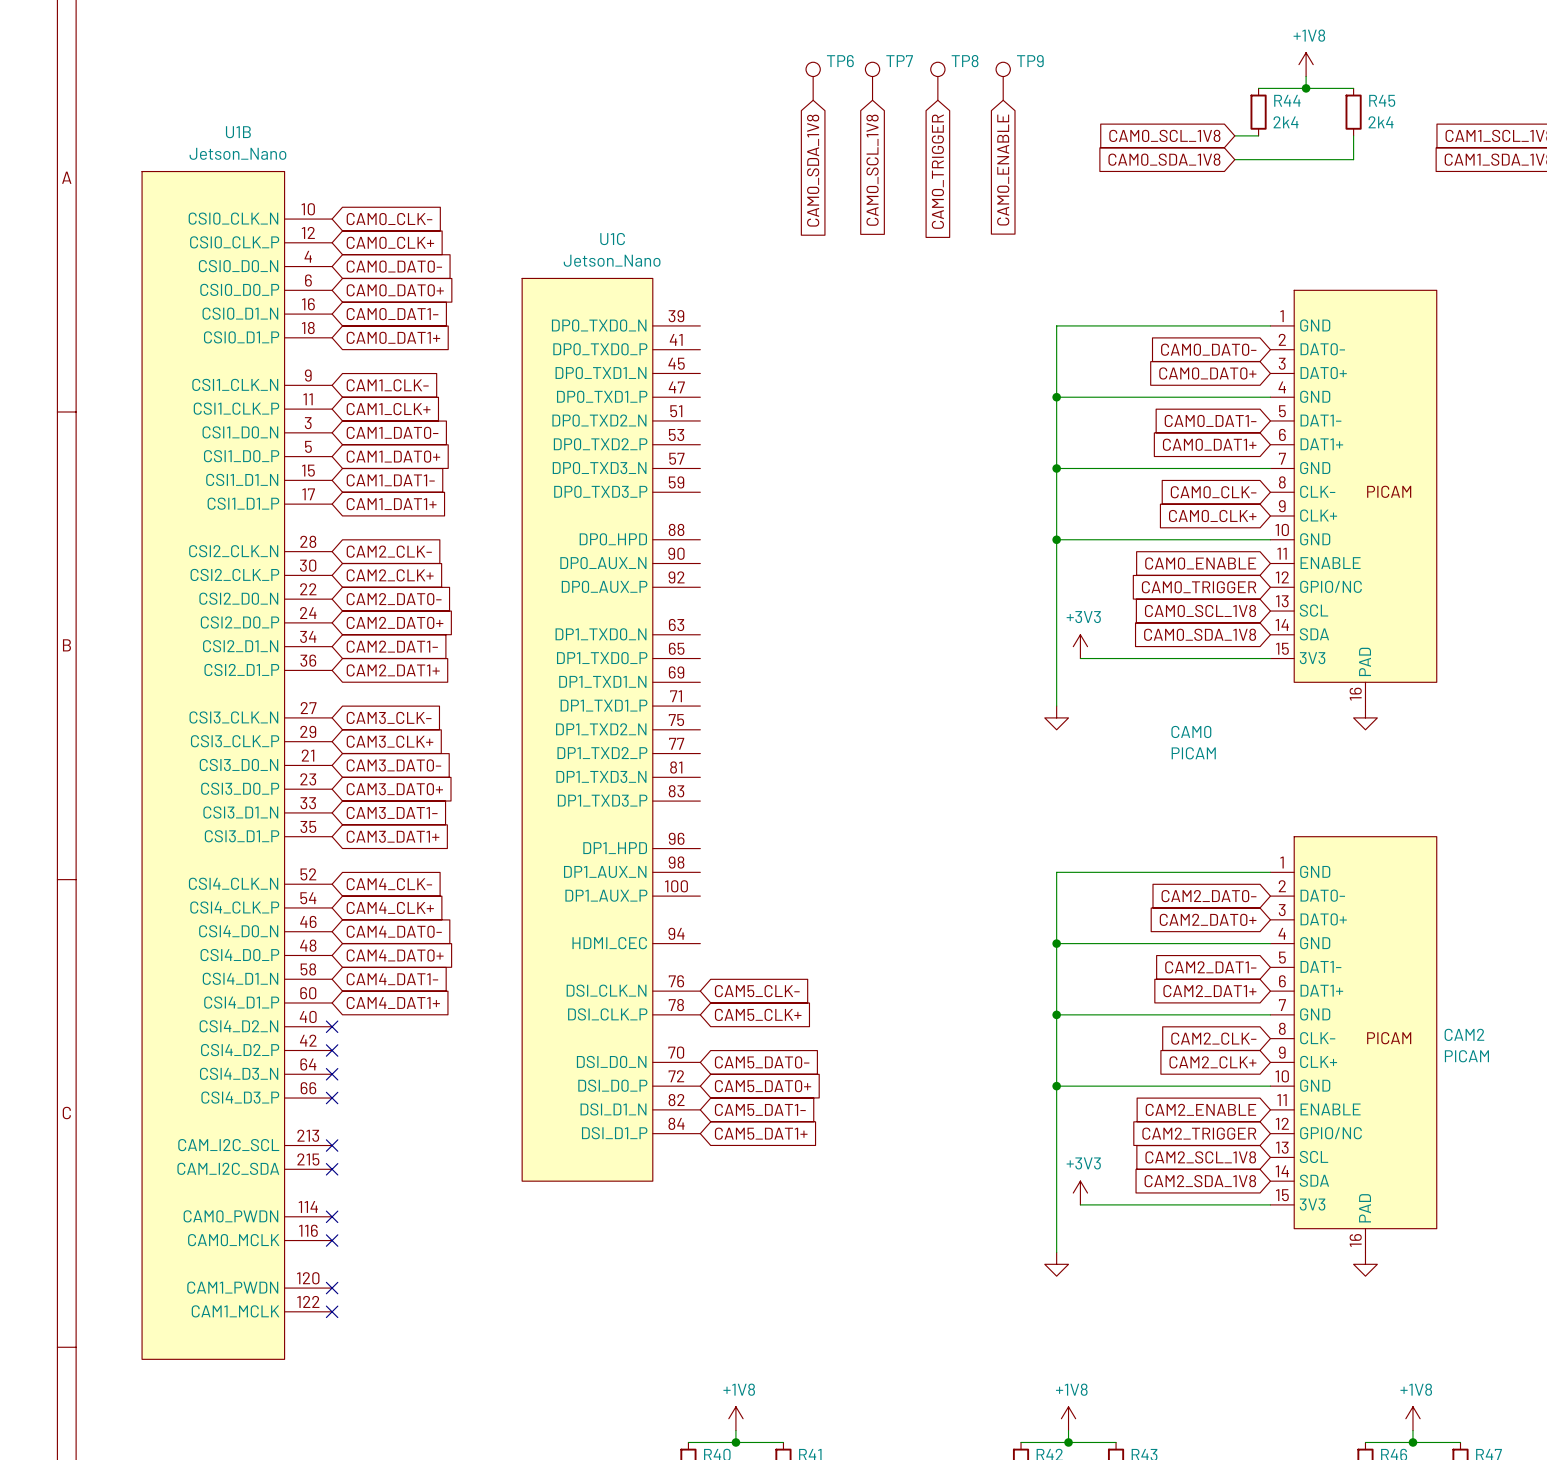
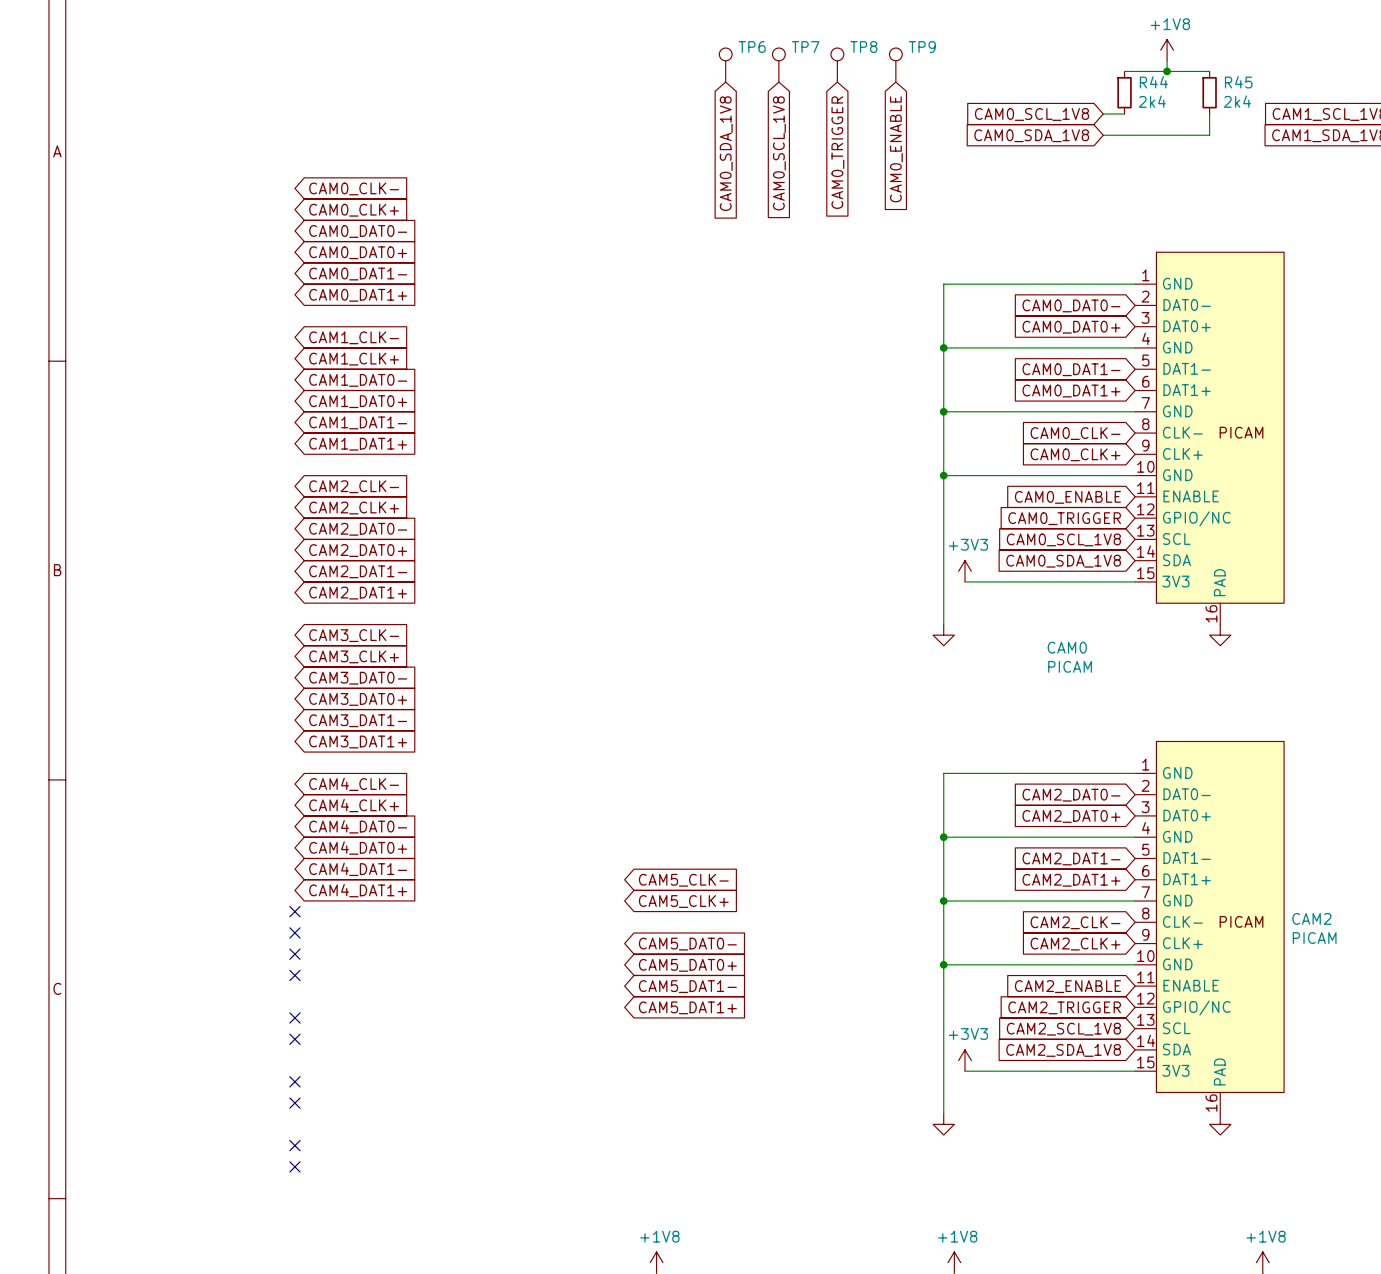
U1C: Jetson_Nano (611, 729) -> none
U1B: Jetson_Nano (237, 765) -> none

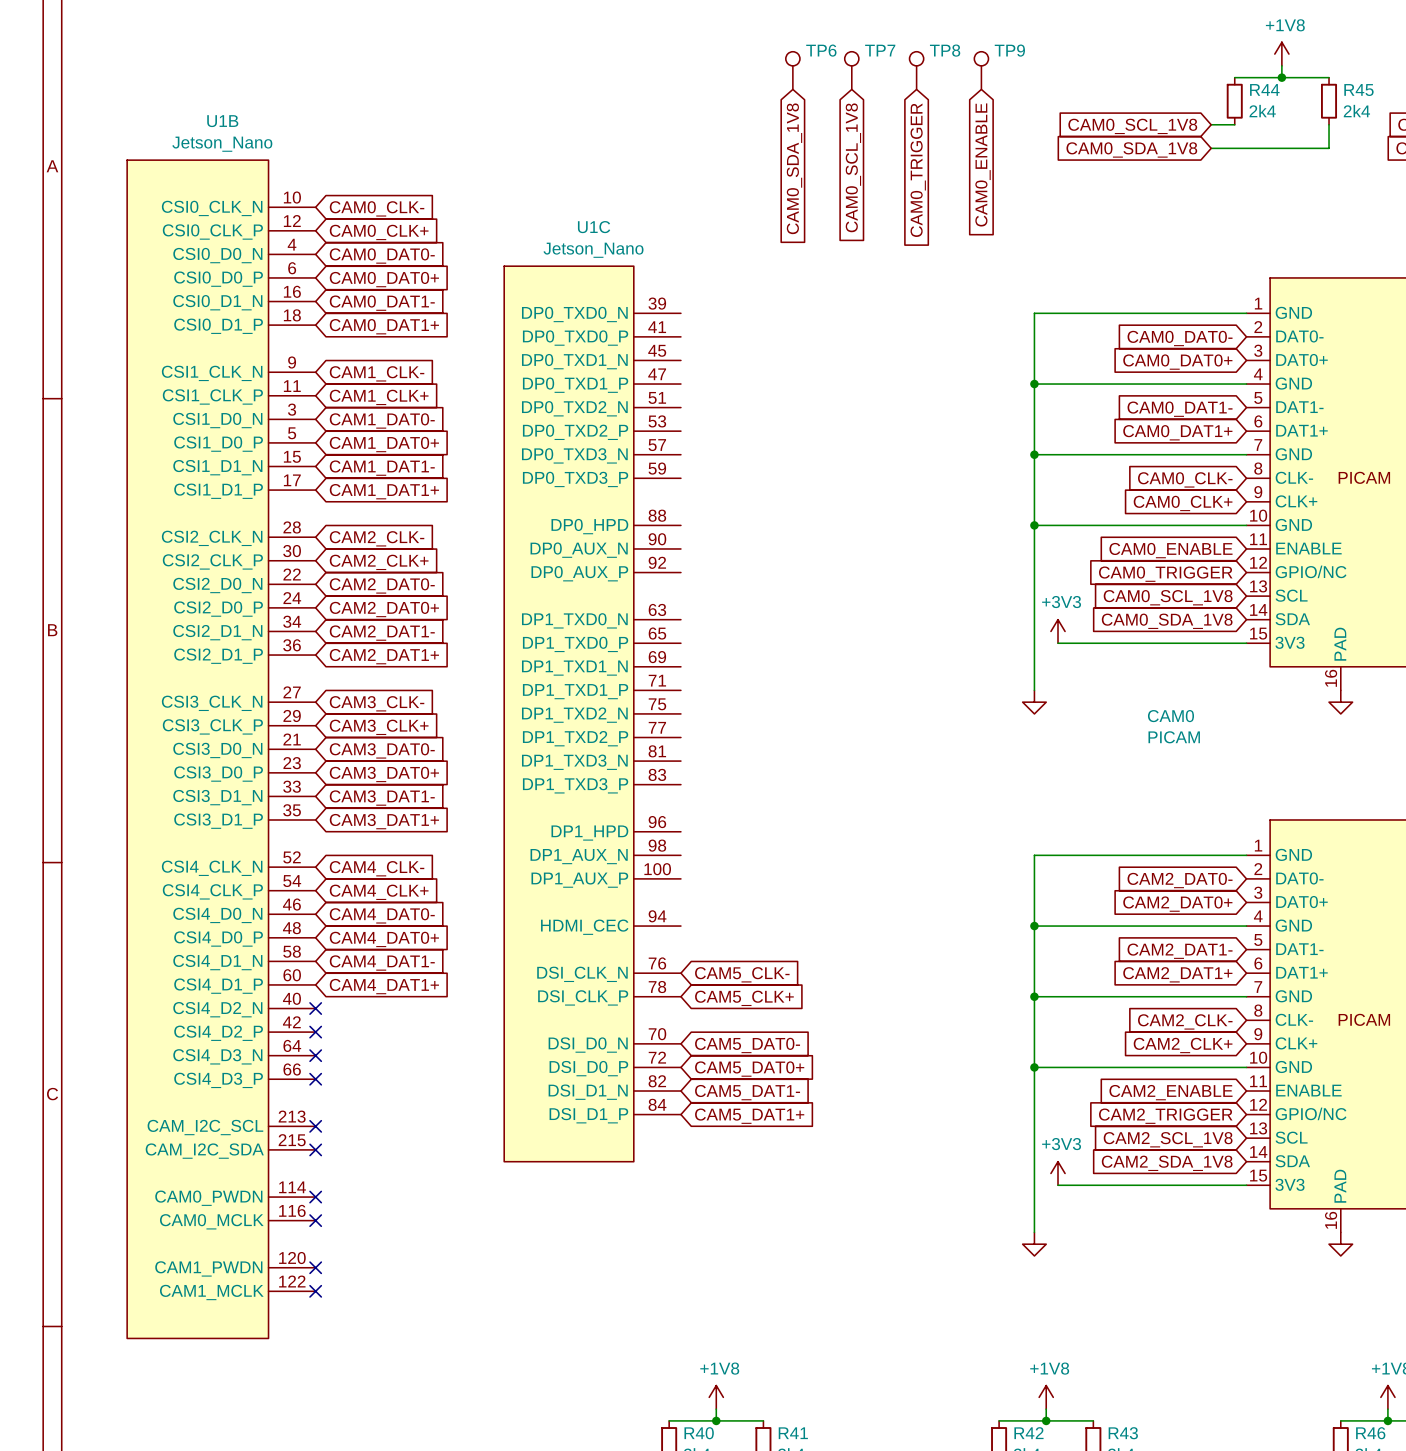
U1C: none -> Jetson_Nano (592, 713)
U1B: none -> Jetson_Nano (221, 749)

